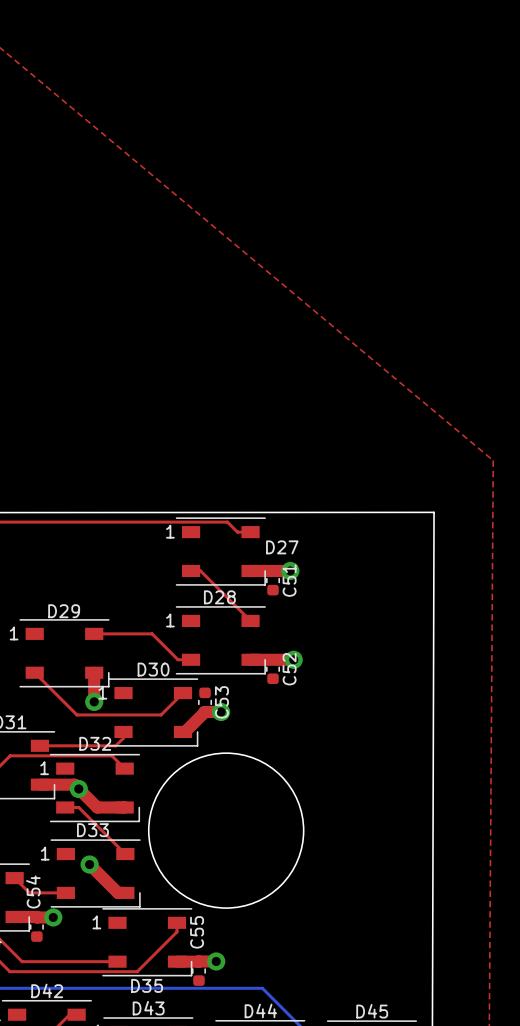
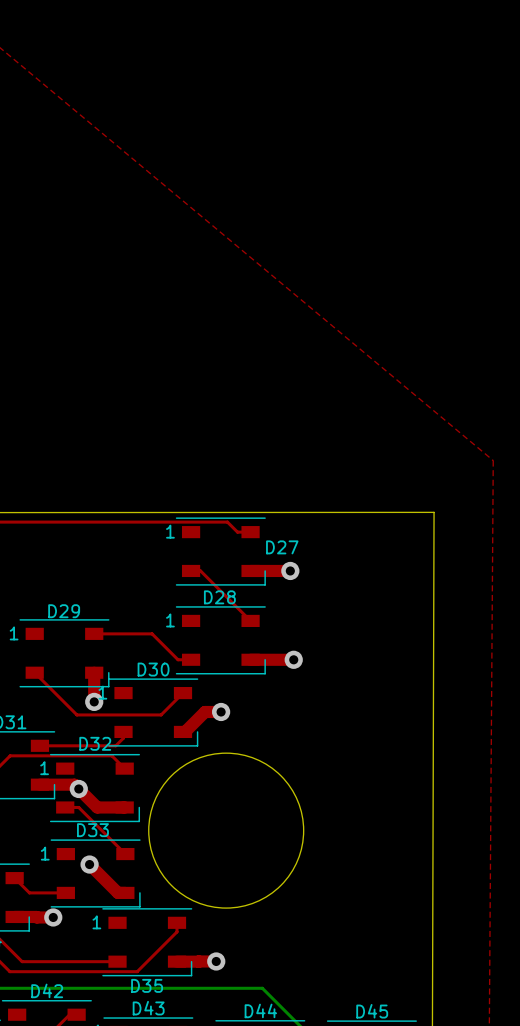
C51: (273, 580) -> none
C52: (273, 669) -> none
C53: (205, 702) -> none
C54: (36, 927) -> none
C55: (198, 971) -> none

